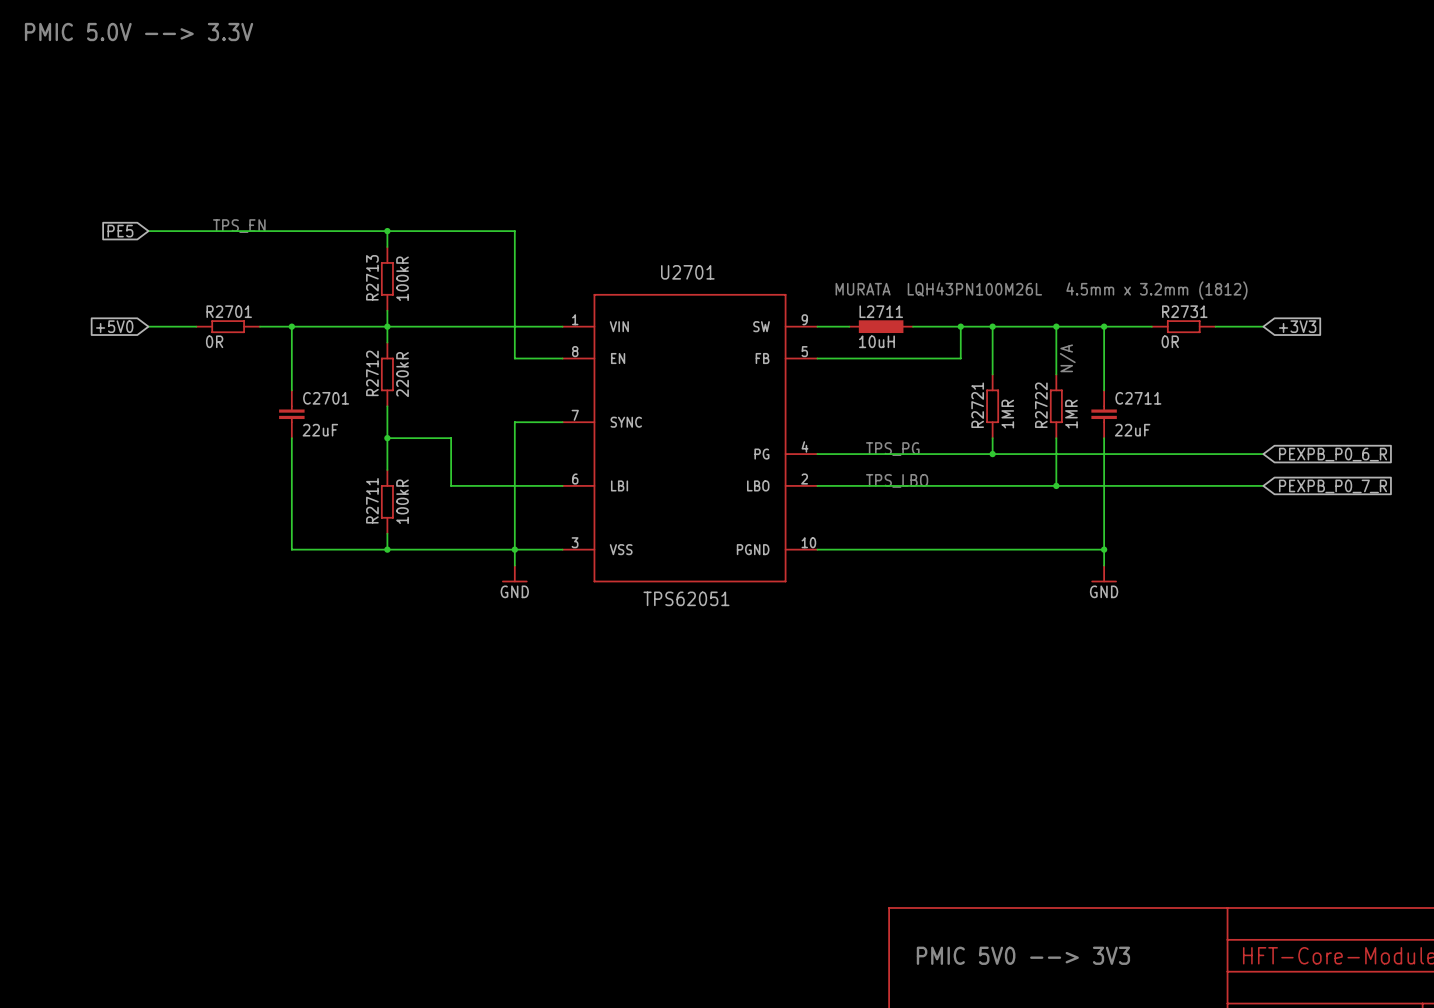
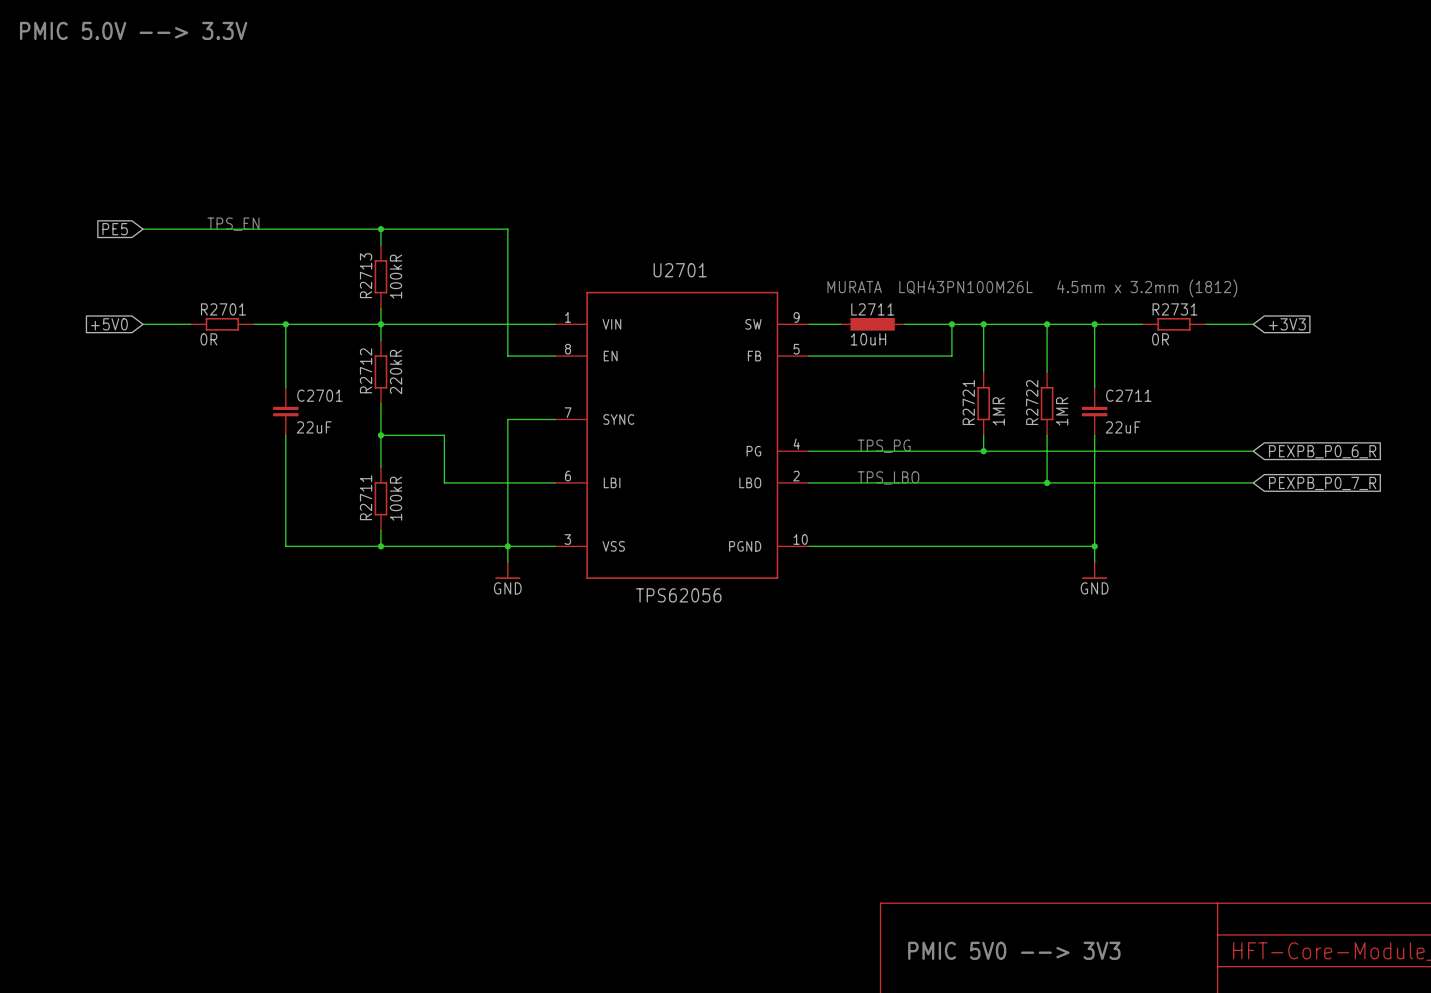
text: N/A (1067, 358) -> none
U2701 value: TPS62051 (686, 598) -> TPS62056 (678, 595)

